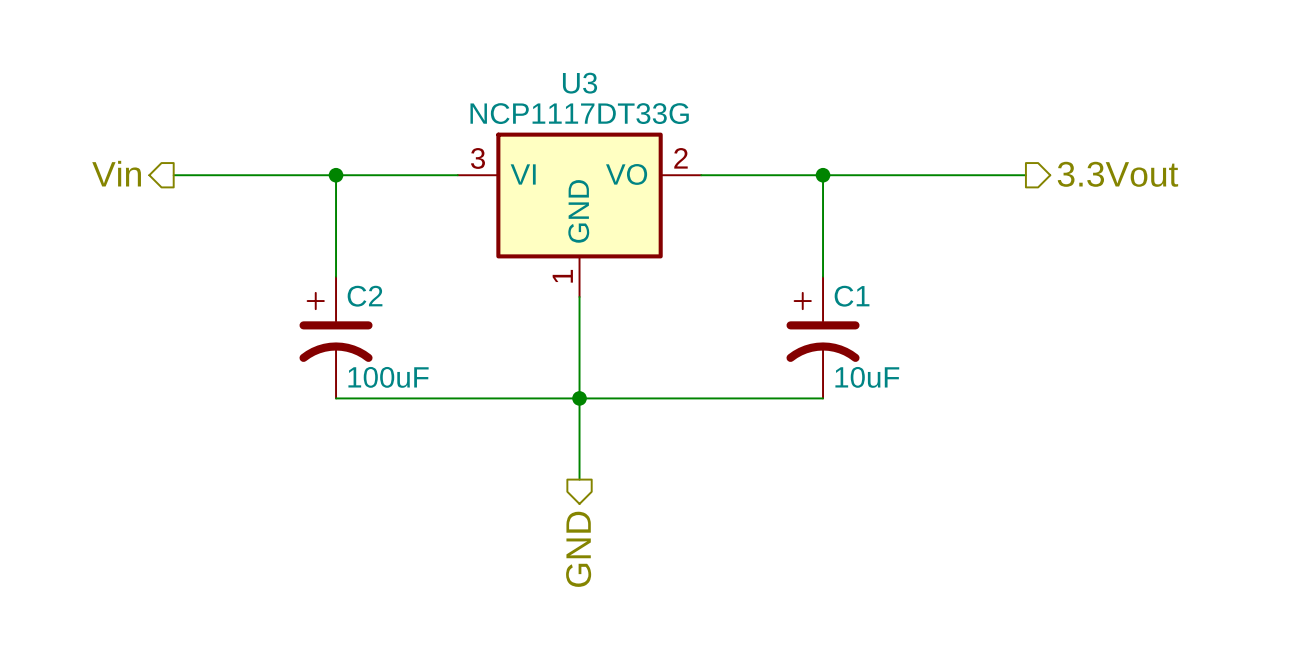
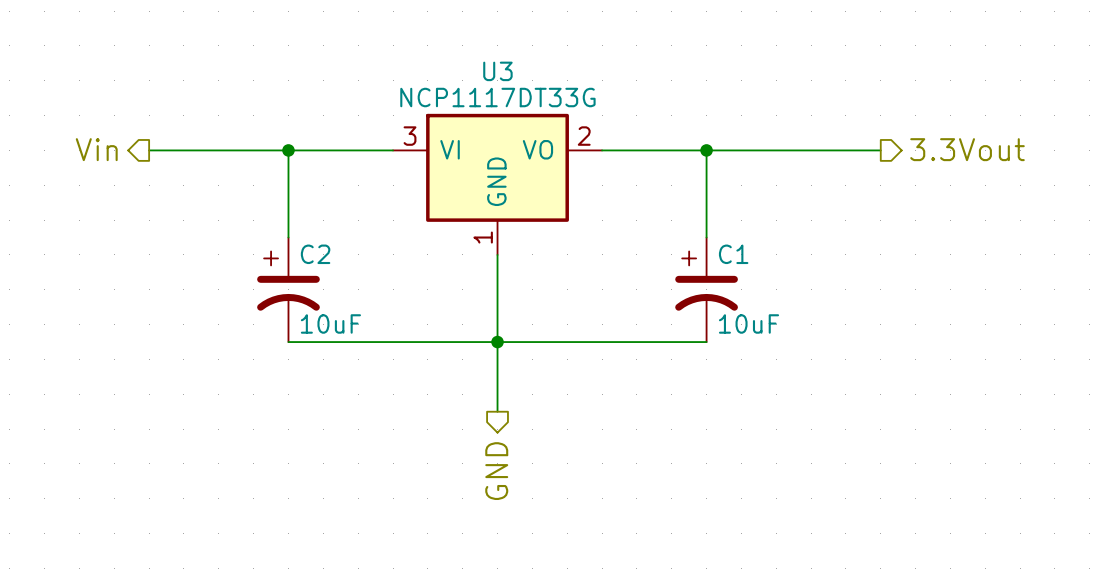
C2 value: 100uF (388, 377) -> 10uF (330, 323)

